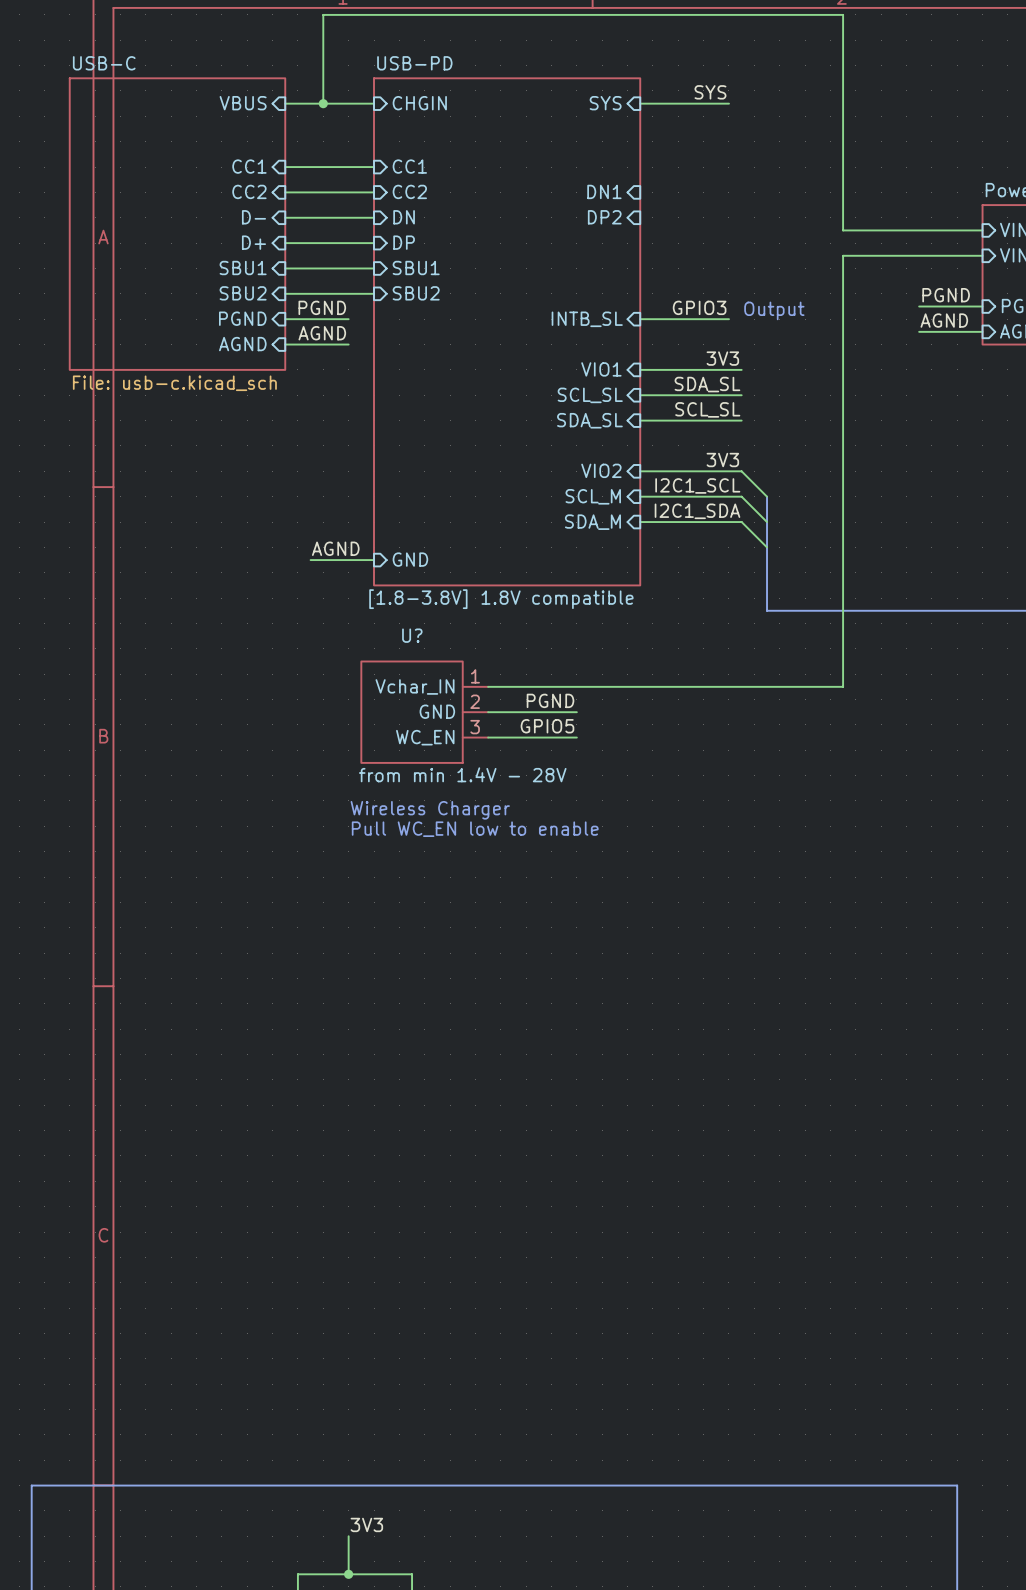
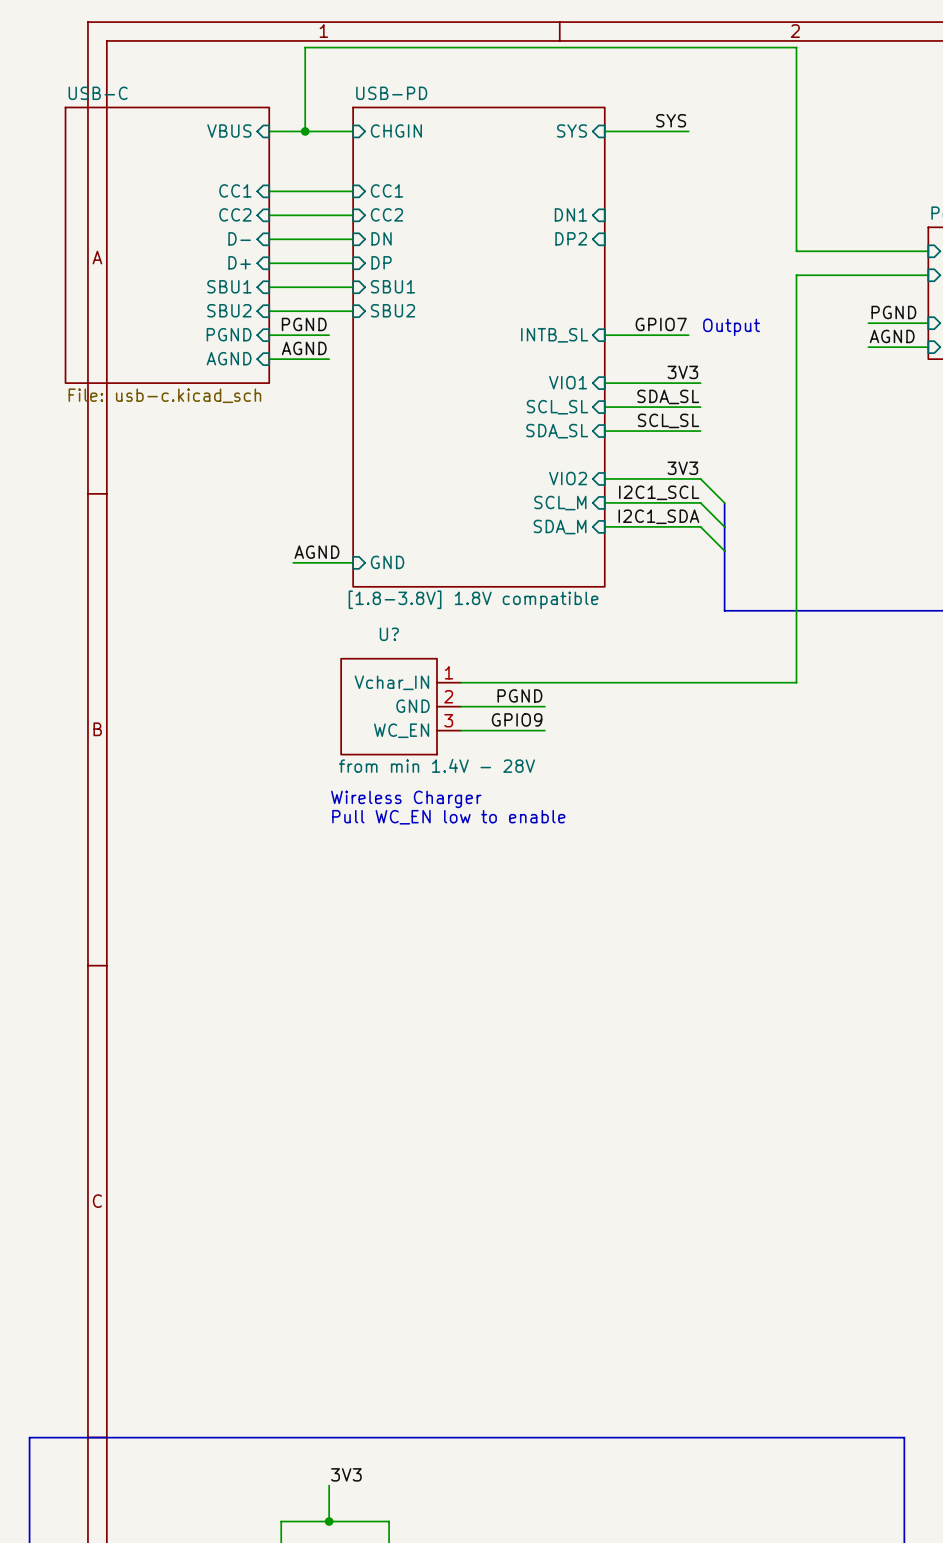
label: GPIO3 (699, 307) -> GPIO7 (661, 324)
label: GPIO5 (547, 726) -> GPIO9 (517, 719)

